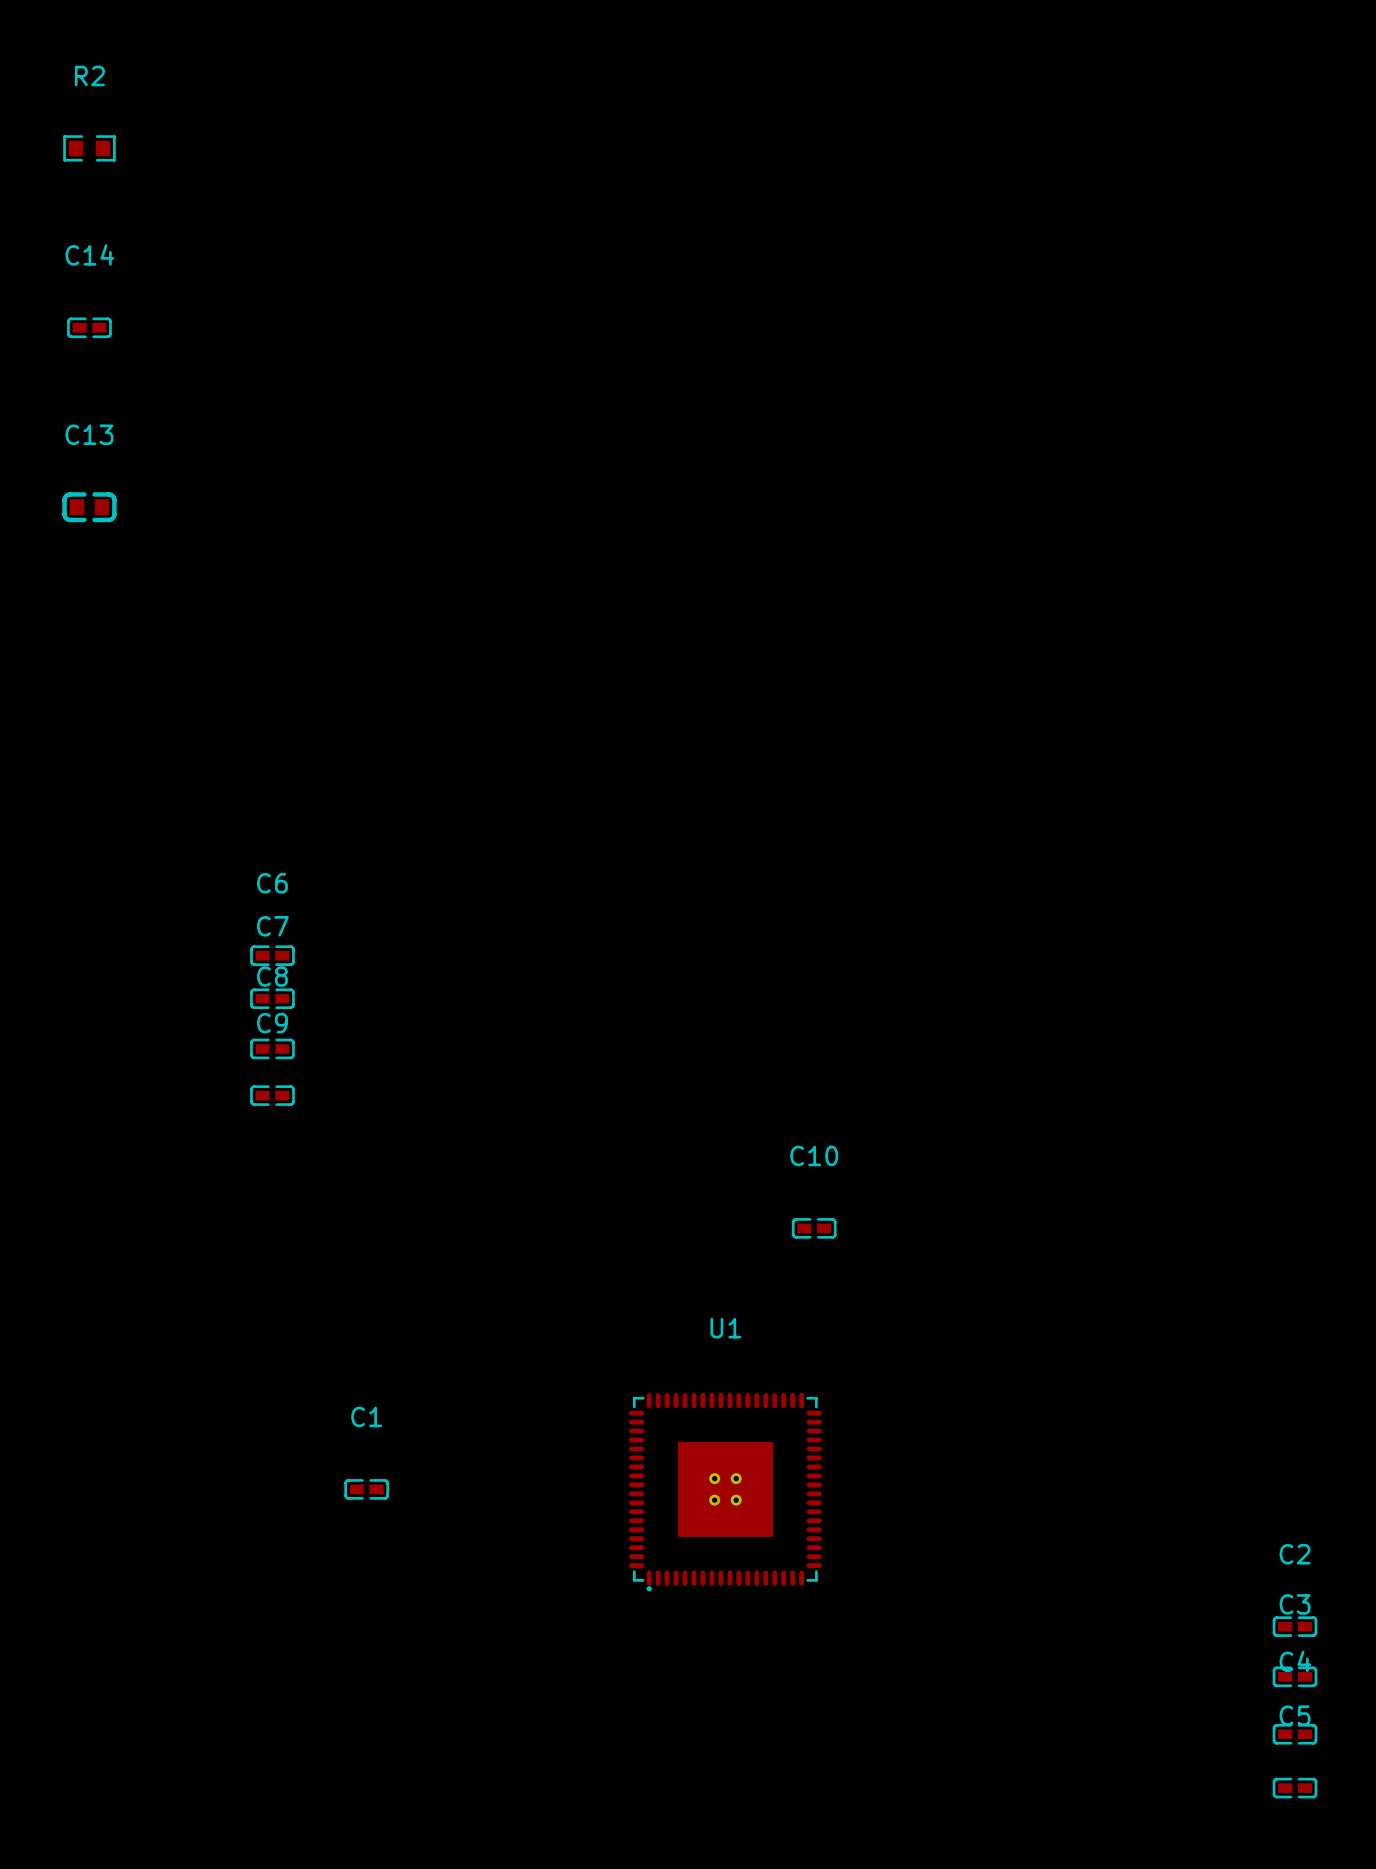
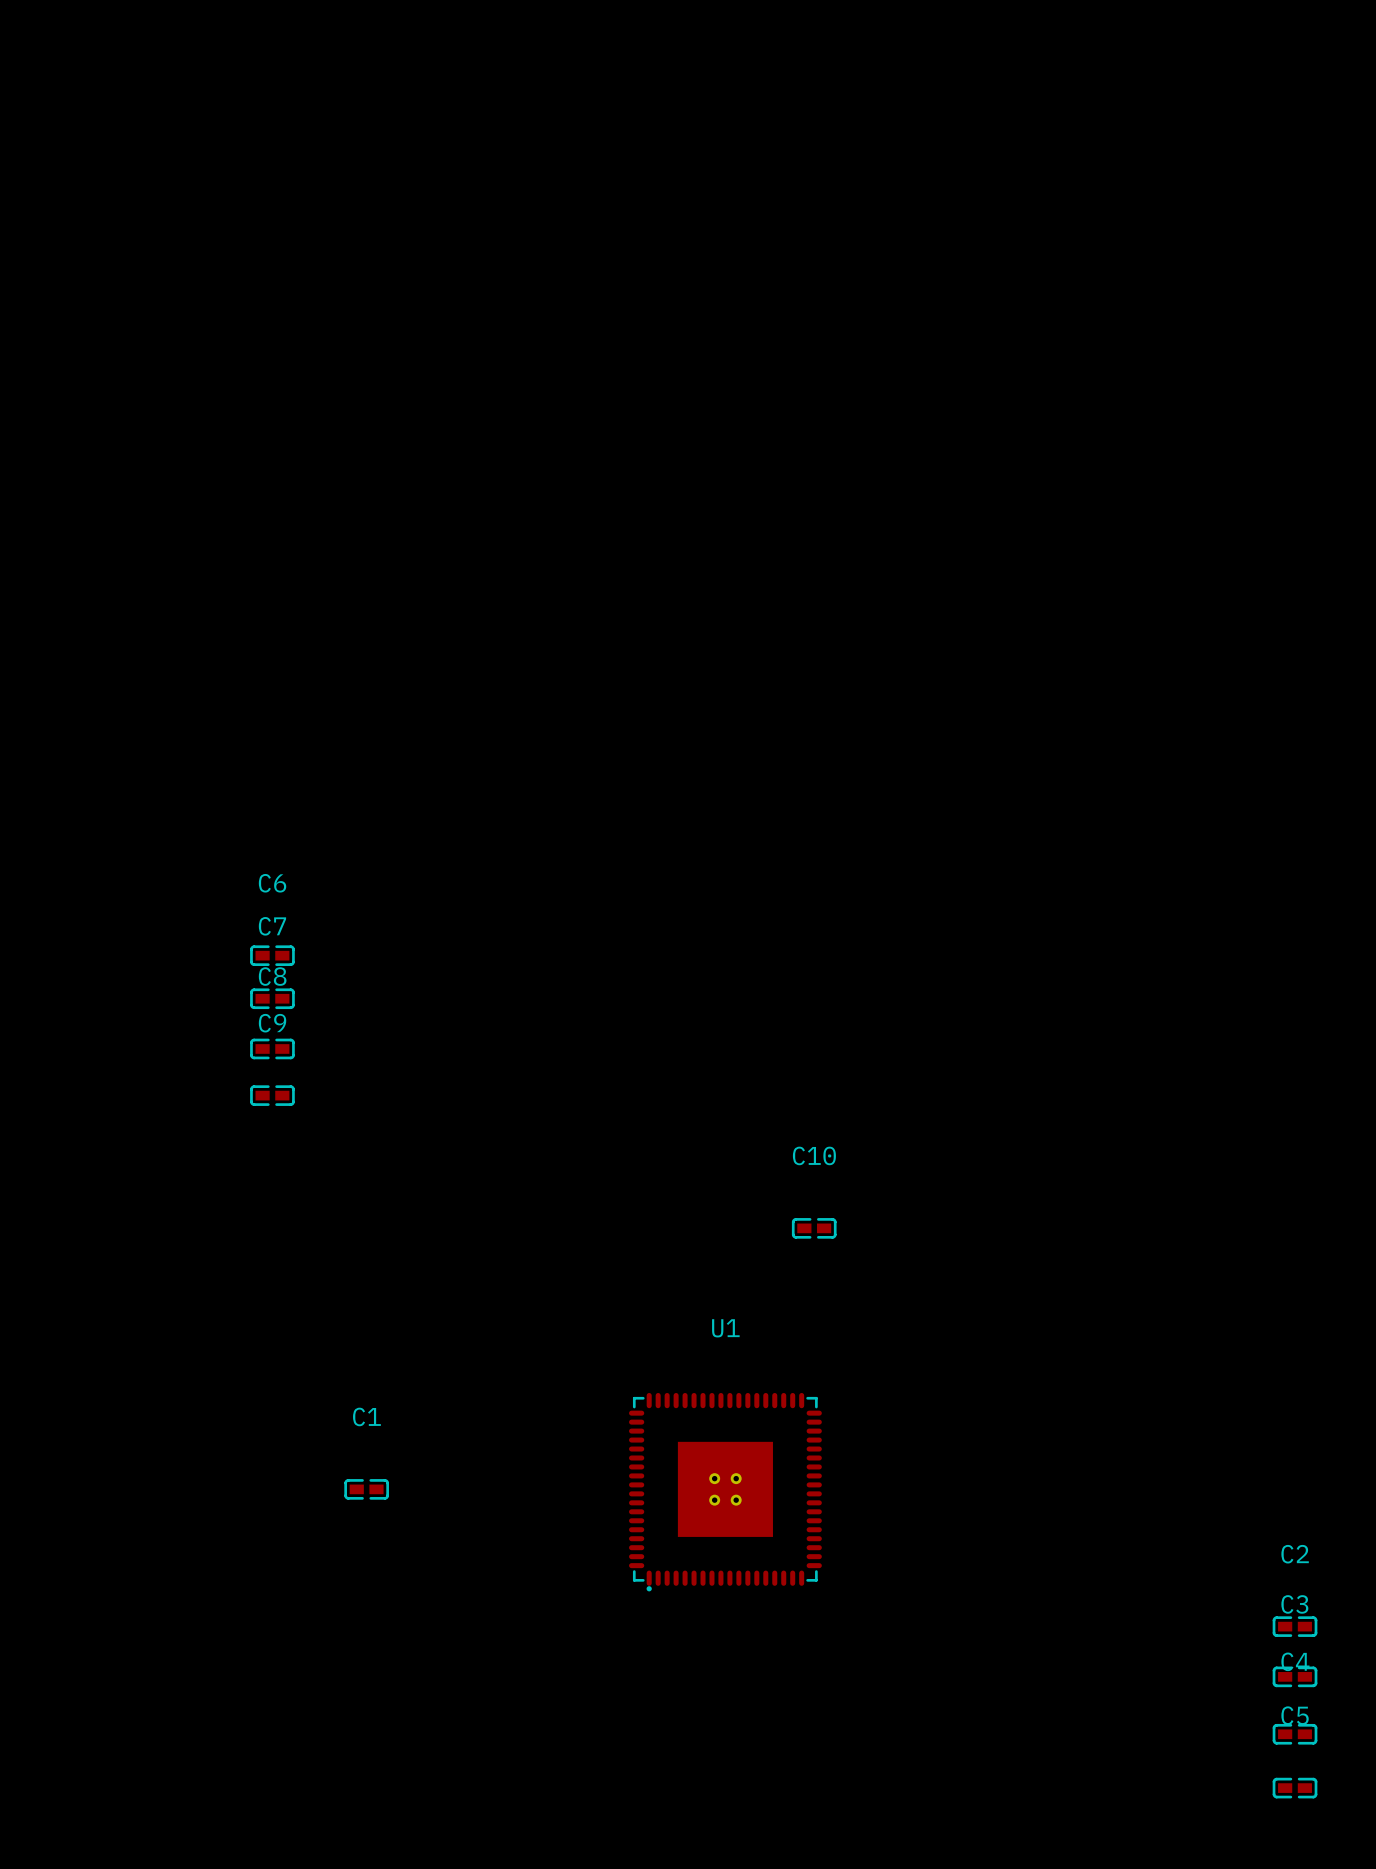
R2: (89, 148) -> none
C14: (89, 327) -> none
C13: (89, 507) -> none

